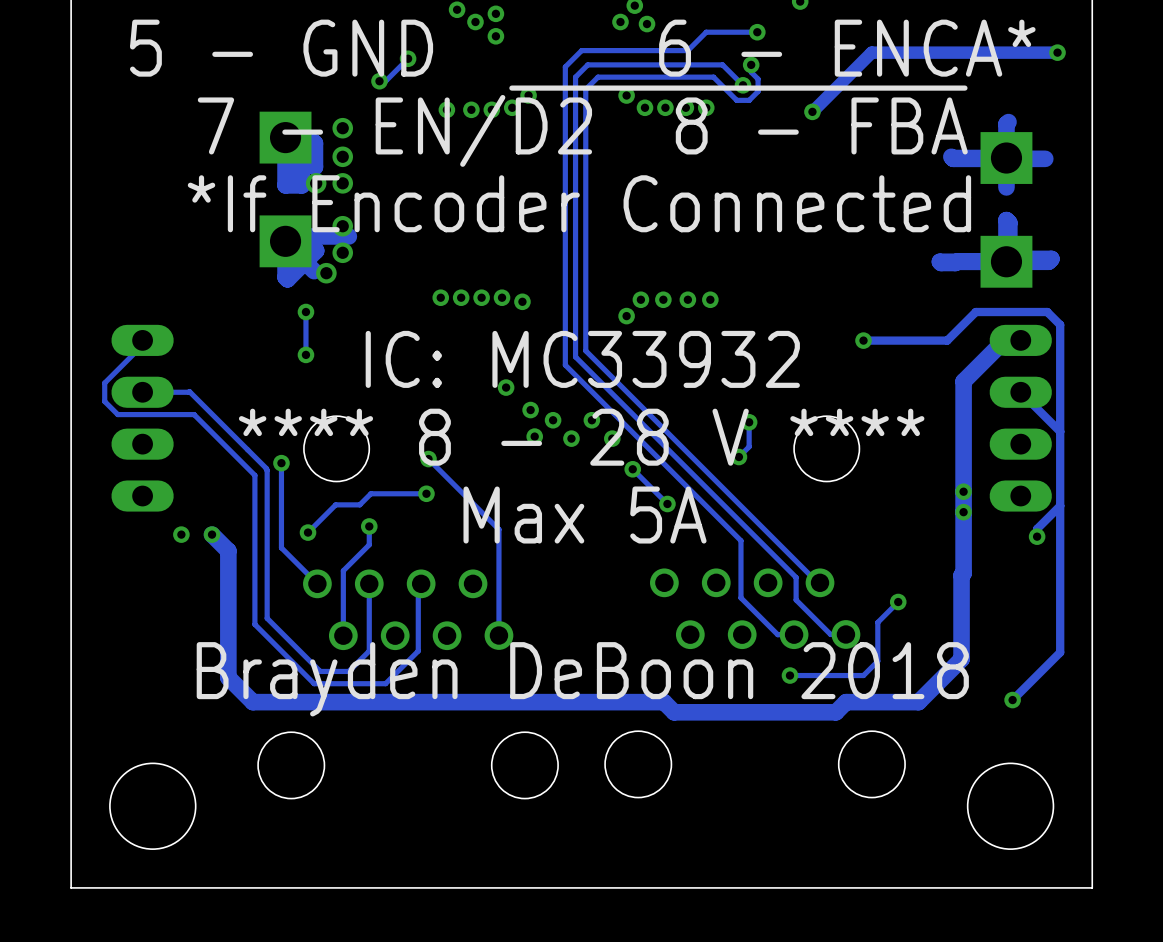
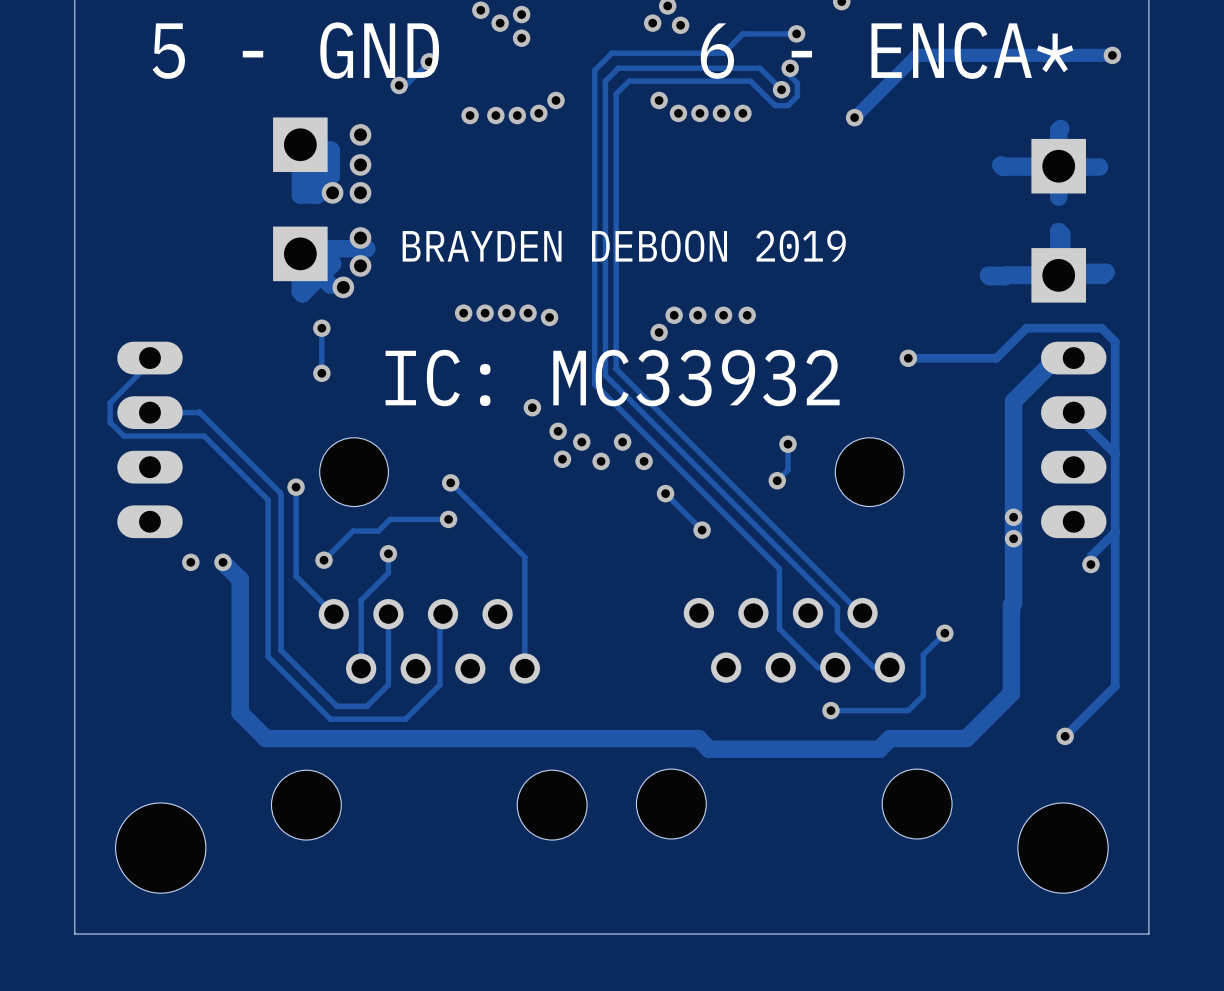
text: 7 - EN/~{D2 8 - FBA} (582, 126) -> none
text: *If Encoder Connected (579, 203) -> none
text: none -> BRAYDEN DEBOON 2019 (624, 246)
text: **** 8 - 28 V **** (581, 437) -> none
text: Max 5A (585, 515) -> none
text: Brayden DeBoon 2018 (582, 679) -> none

